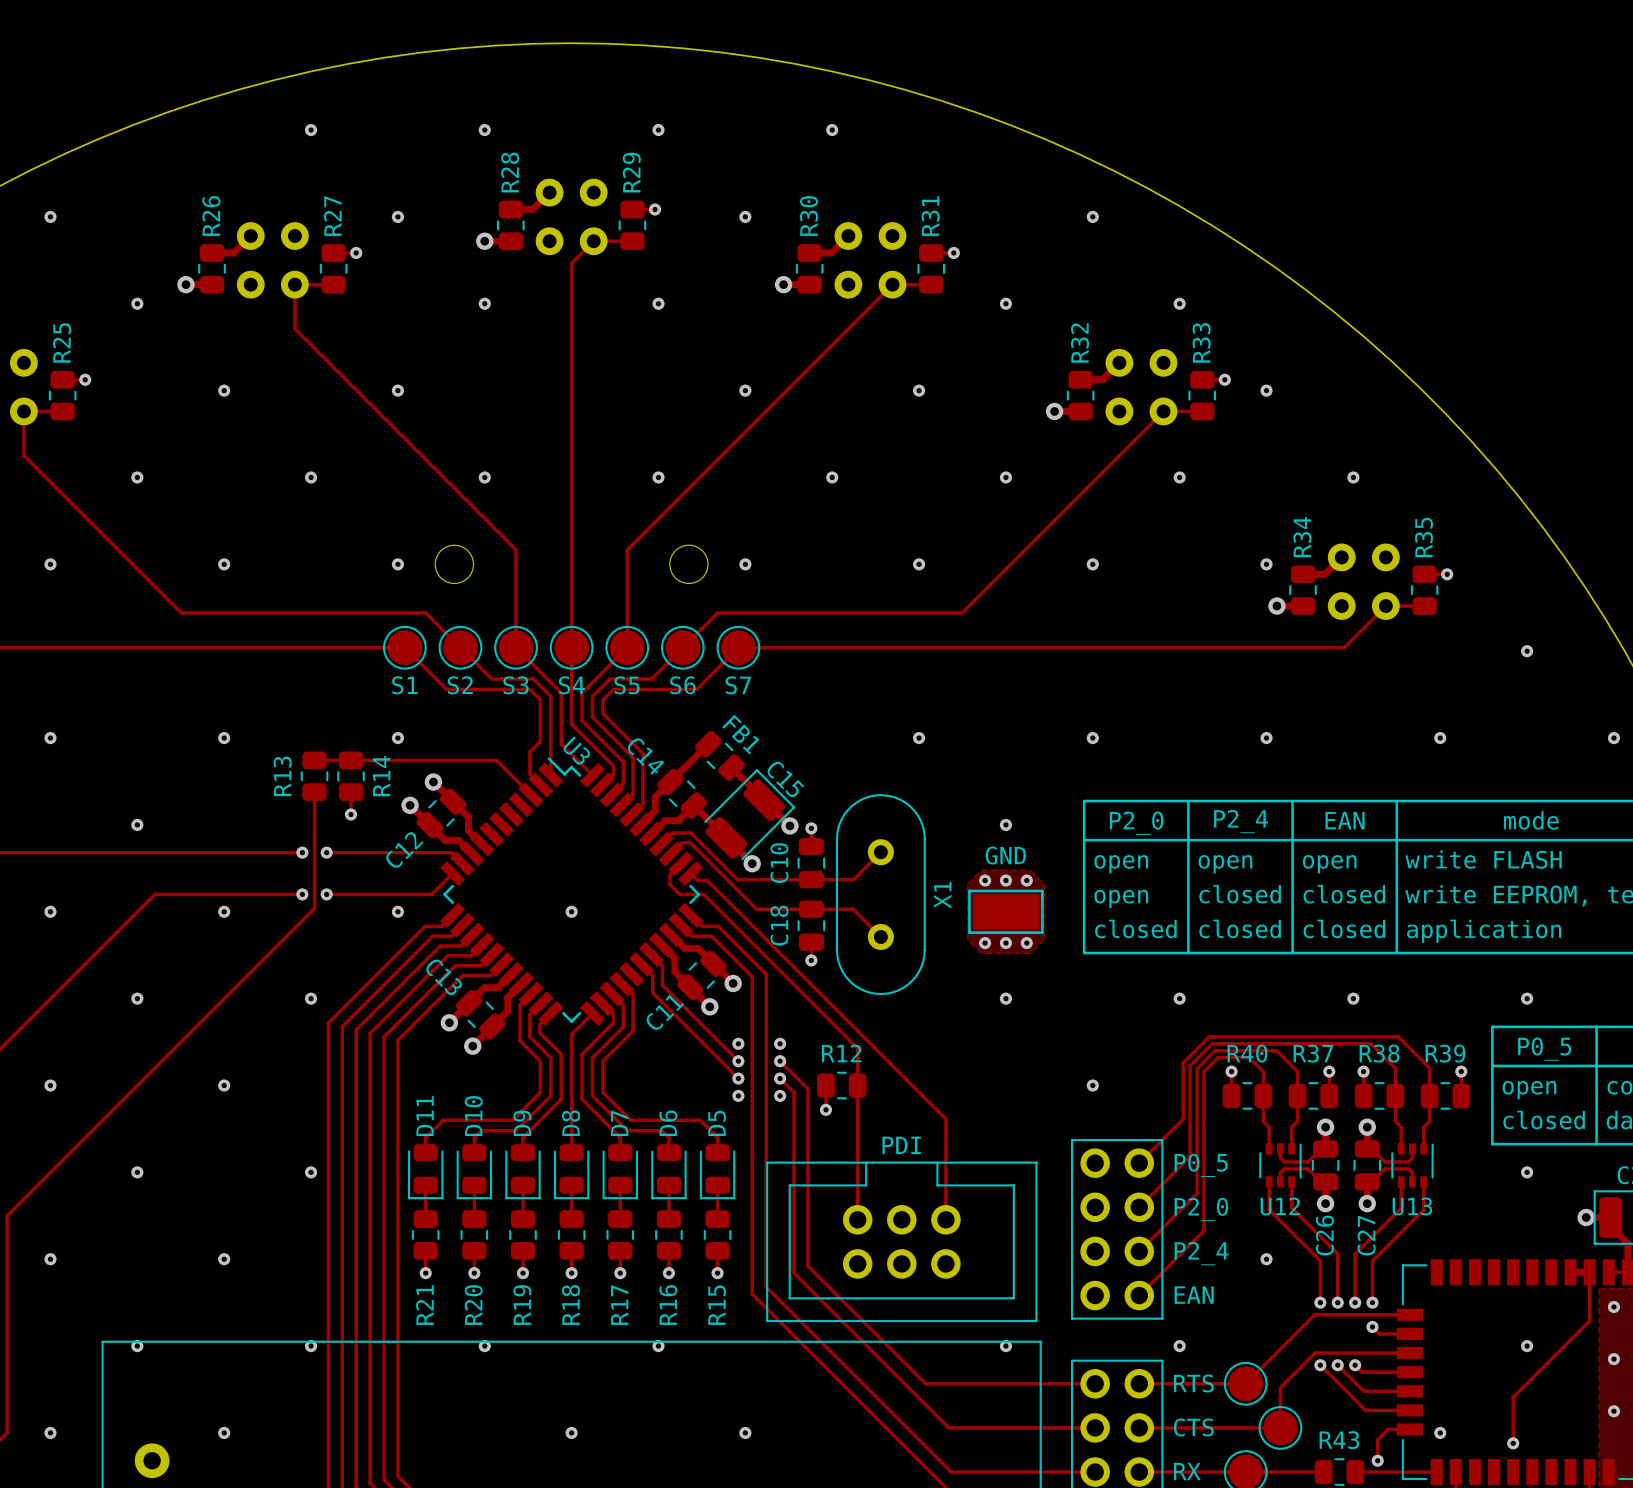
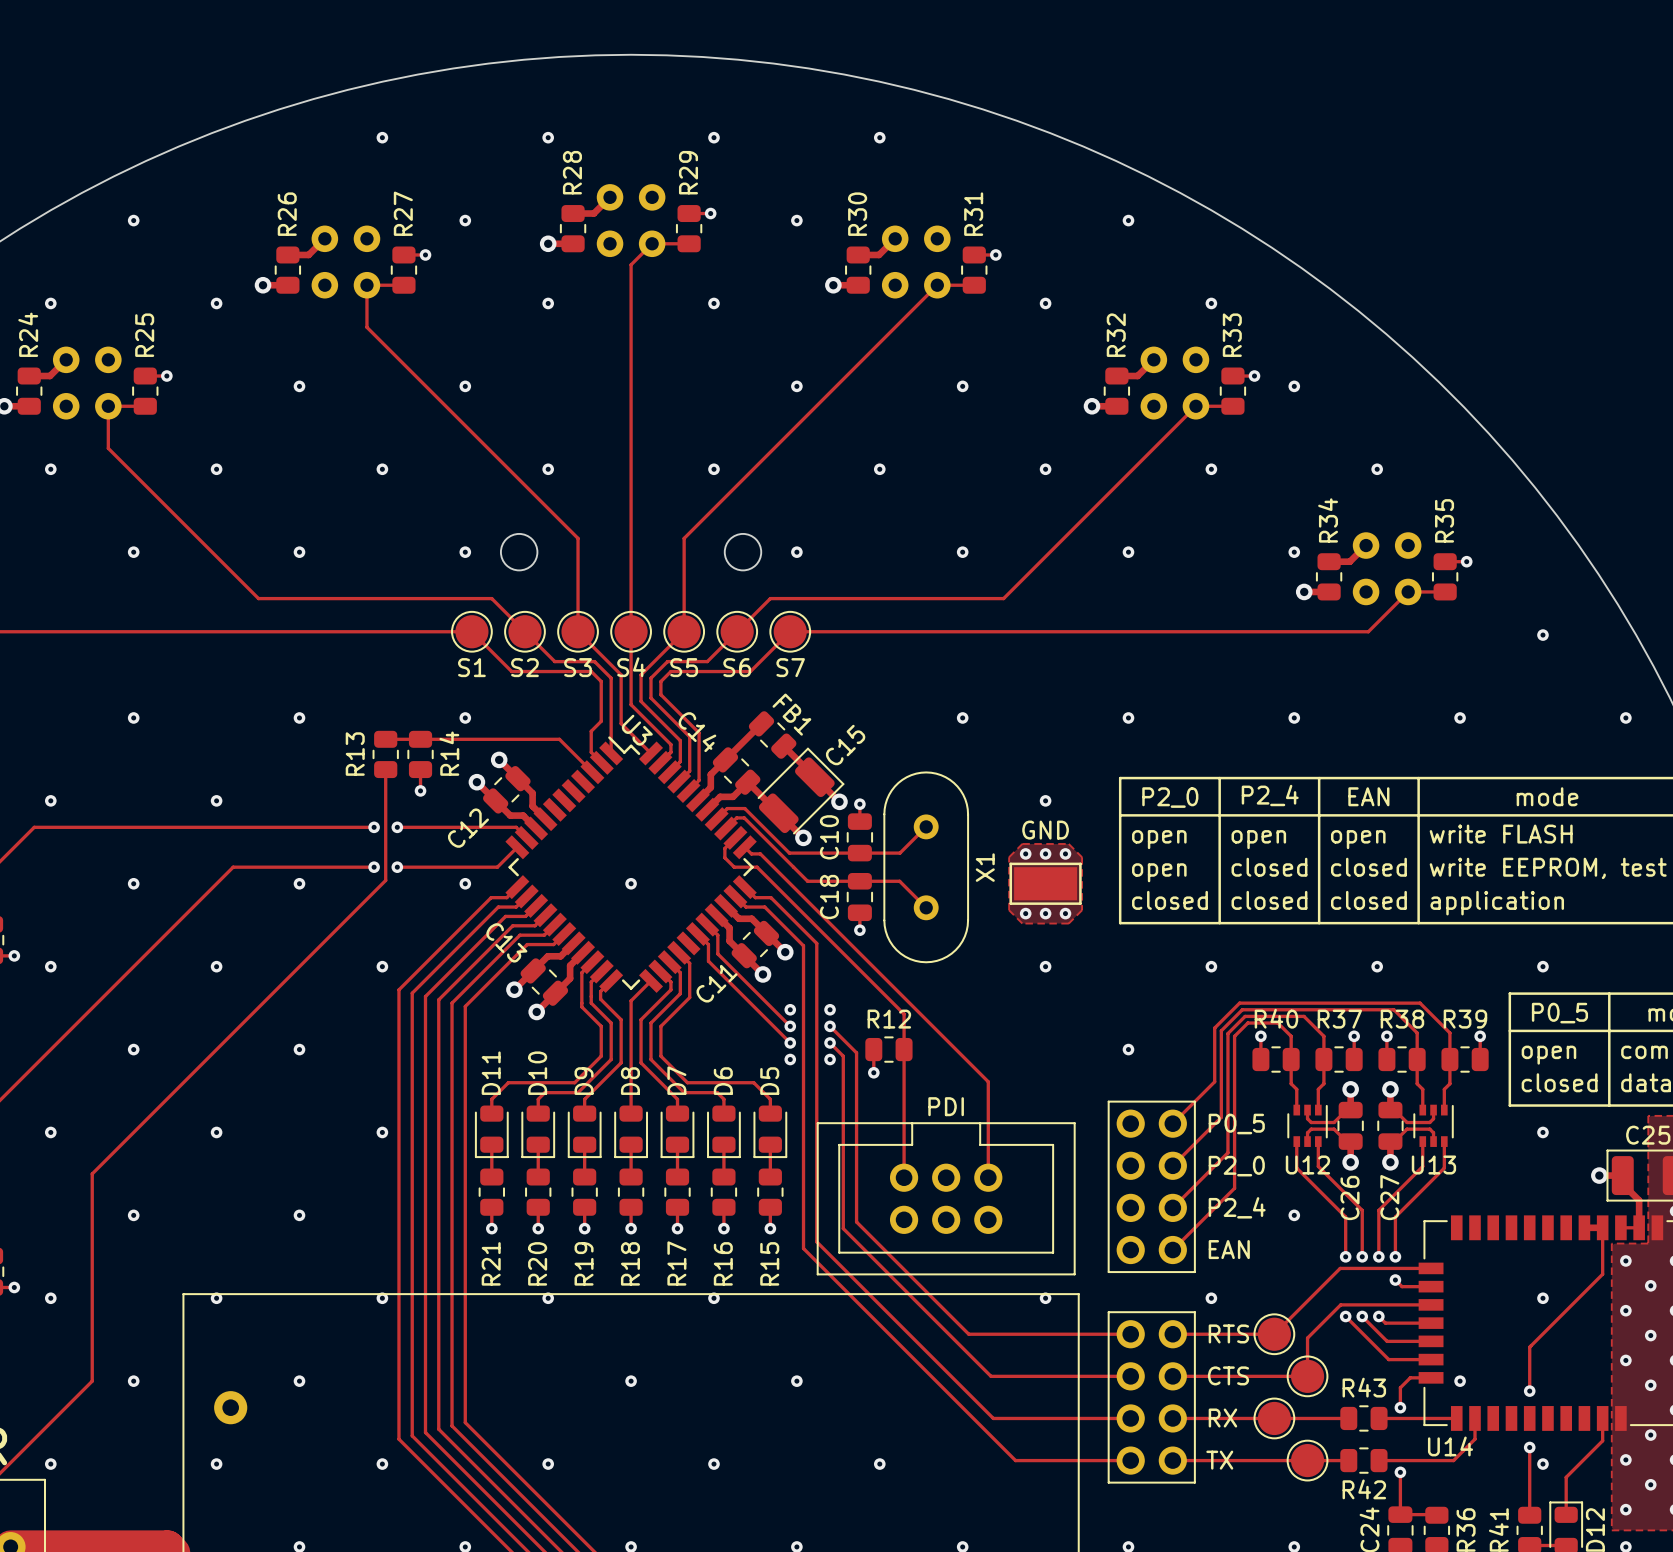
C15 name rotation: 0° (785, 779) -> 90° counterclockwise (845, 745)

